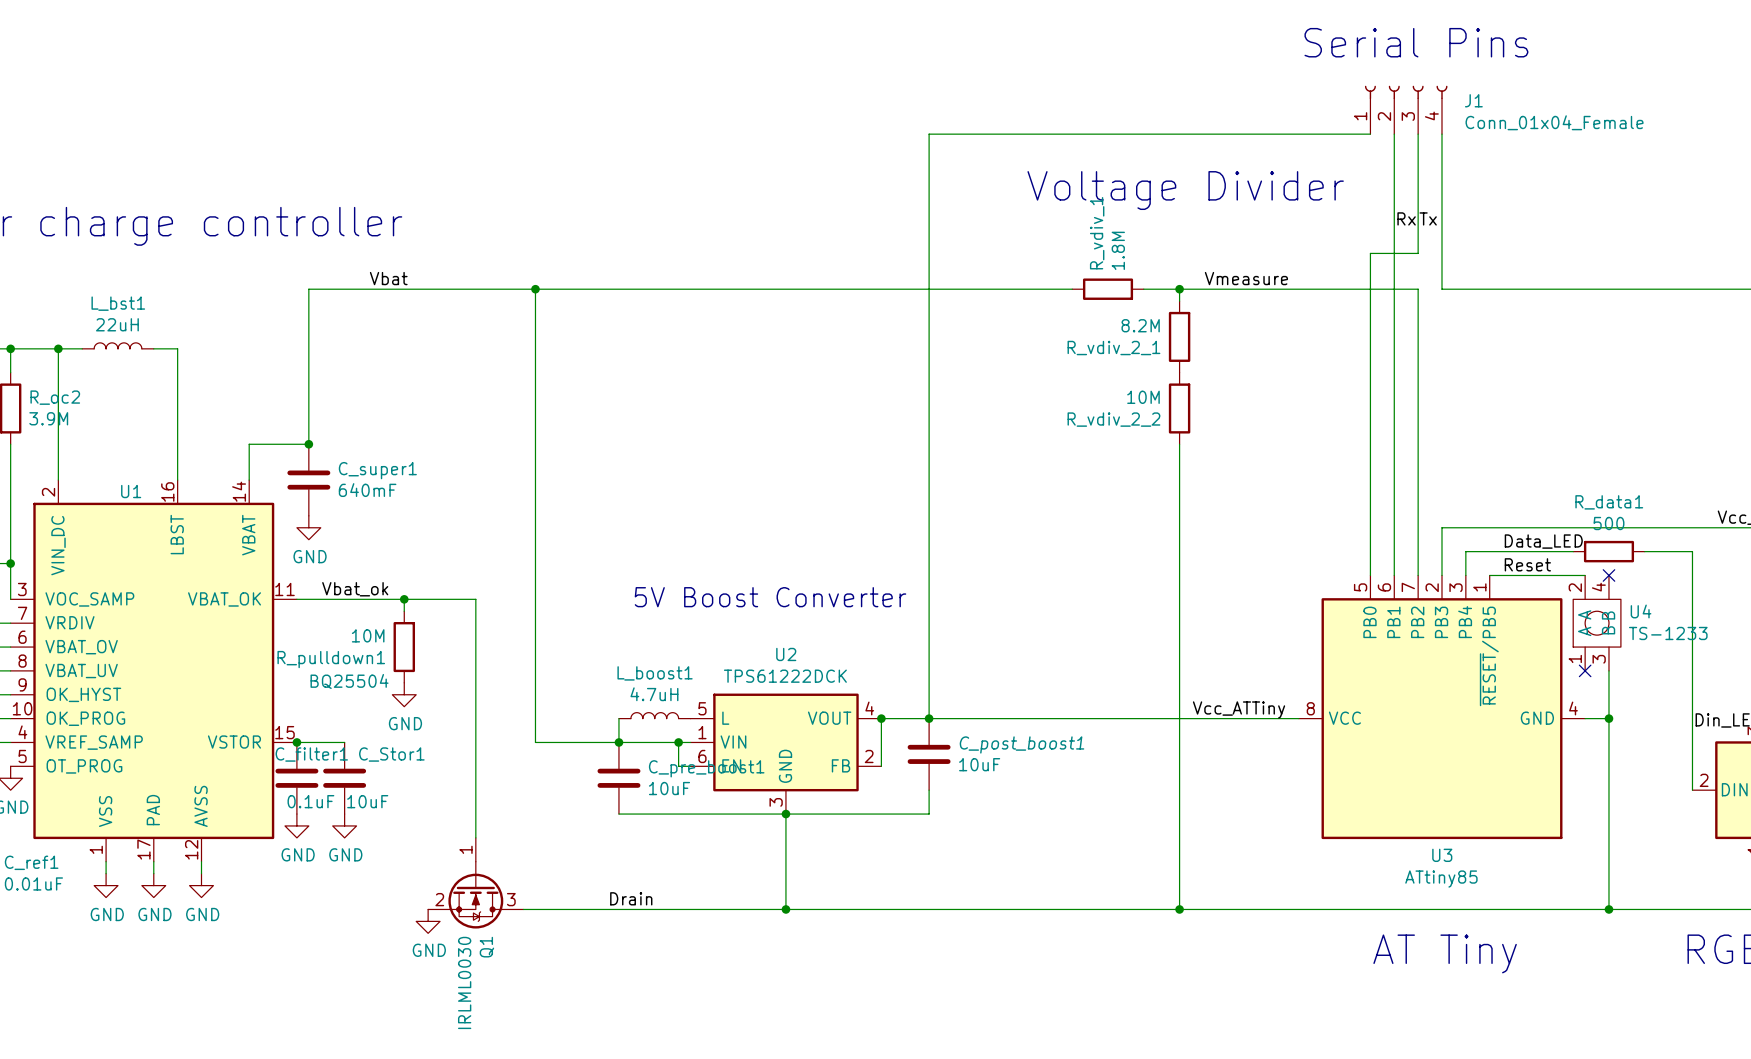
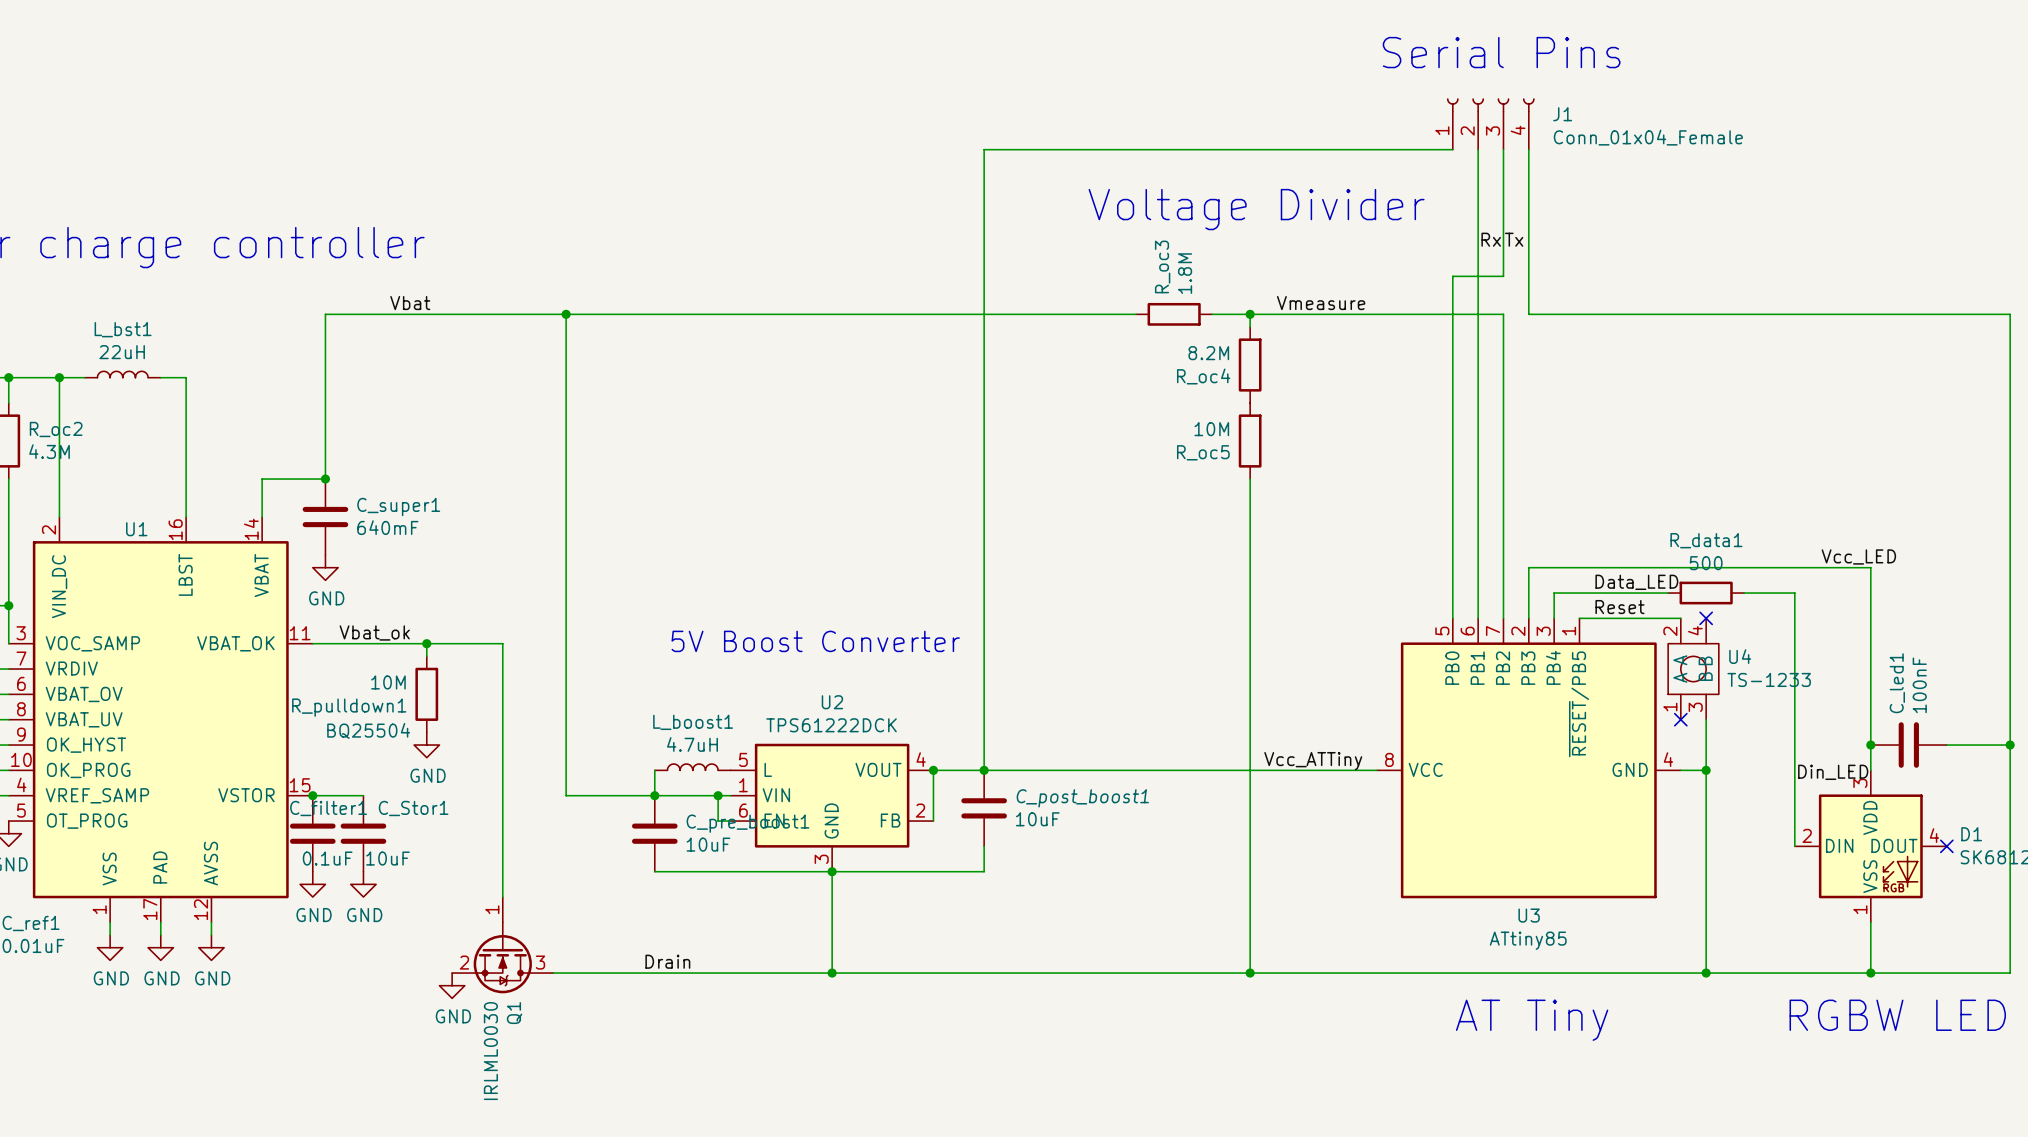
R_vdiv_1 name: R_vdiv_1 (1097, 233) -> R_oc3 (1162, 266)
R_vdiv_2_1 name: R_vdiv_2_1 (1113, 348) -> R_oc4 (1203, 376)
R_oc2 value: 3.9M (48, 418) -> 4.3M (49, 451)
R_vdiv_2_2 name: R_vdiv_2_2 (1113, 419) -> R_oc5 (1203, 452)

